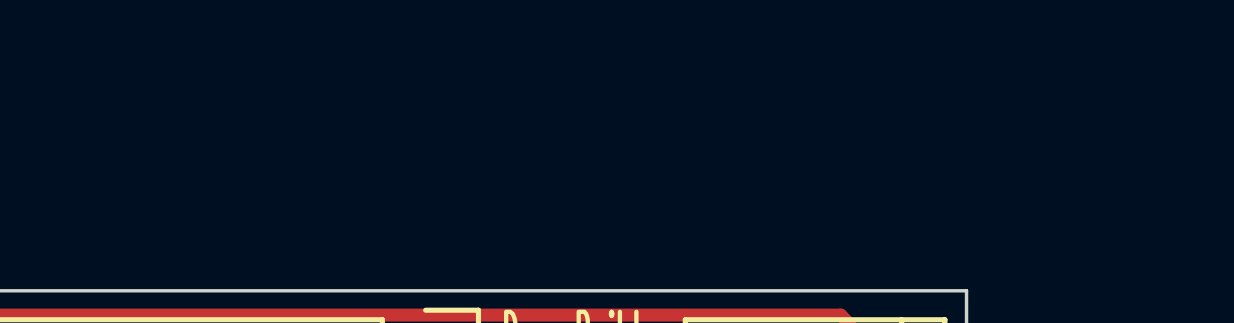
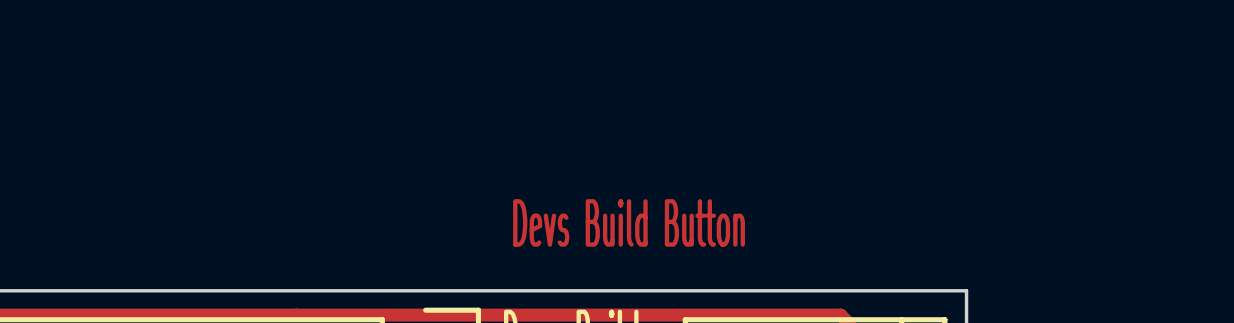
text: none -> Devs Build Button (629, 222)

